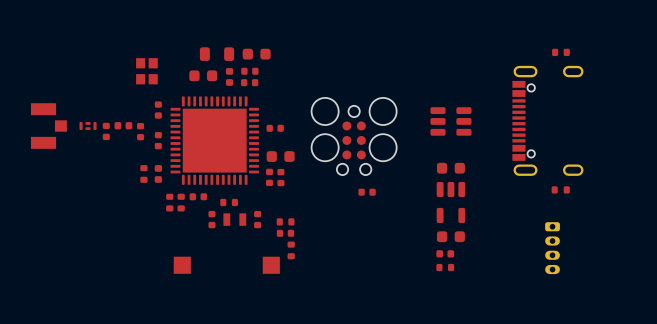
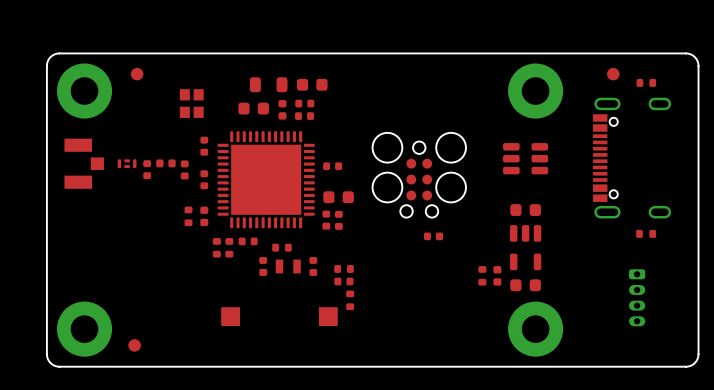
board edge: none -> (685, 53) (54, 54) (48, 59) (46, 65) (48, 359) (52, 364) (59, 366) (691, 365) (696, 360) (698, 354) (698, 65) (694, 57) (685, 53)
part: none -> (137, 74)
part: none -> (613, 74)
part: none -> (84, 91)
part: none -> (535, 91)
part rotation: 0° (445, 253) -> 90° clockwise (497, 275)
part position: (445, 253) -> (497, 275)
part rotation: 0° (445, 267) -> 90° clockwise (482, 275)
part position: (445, 267) -> (482, 275)
part: none -> (84, 329)
part: none -> (535, 329)
part: none -> (134, 345)

